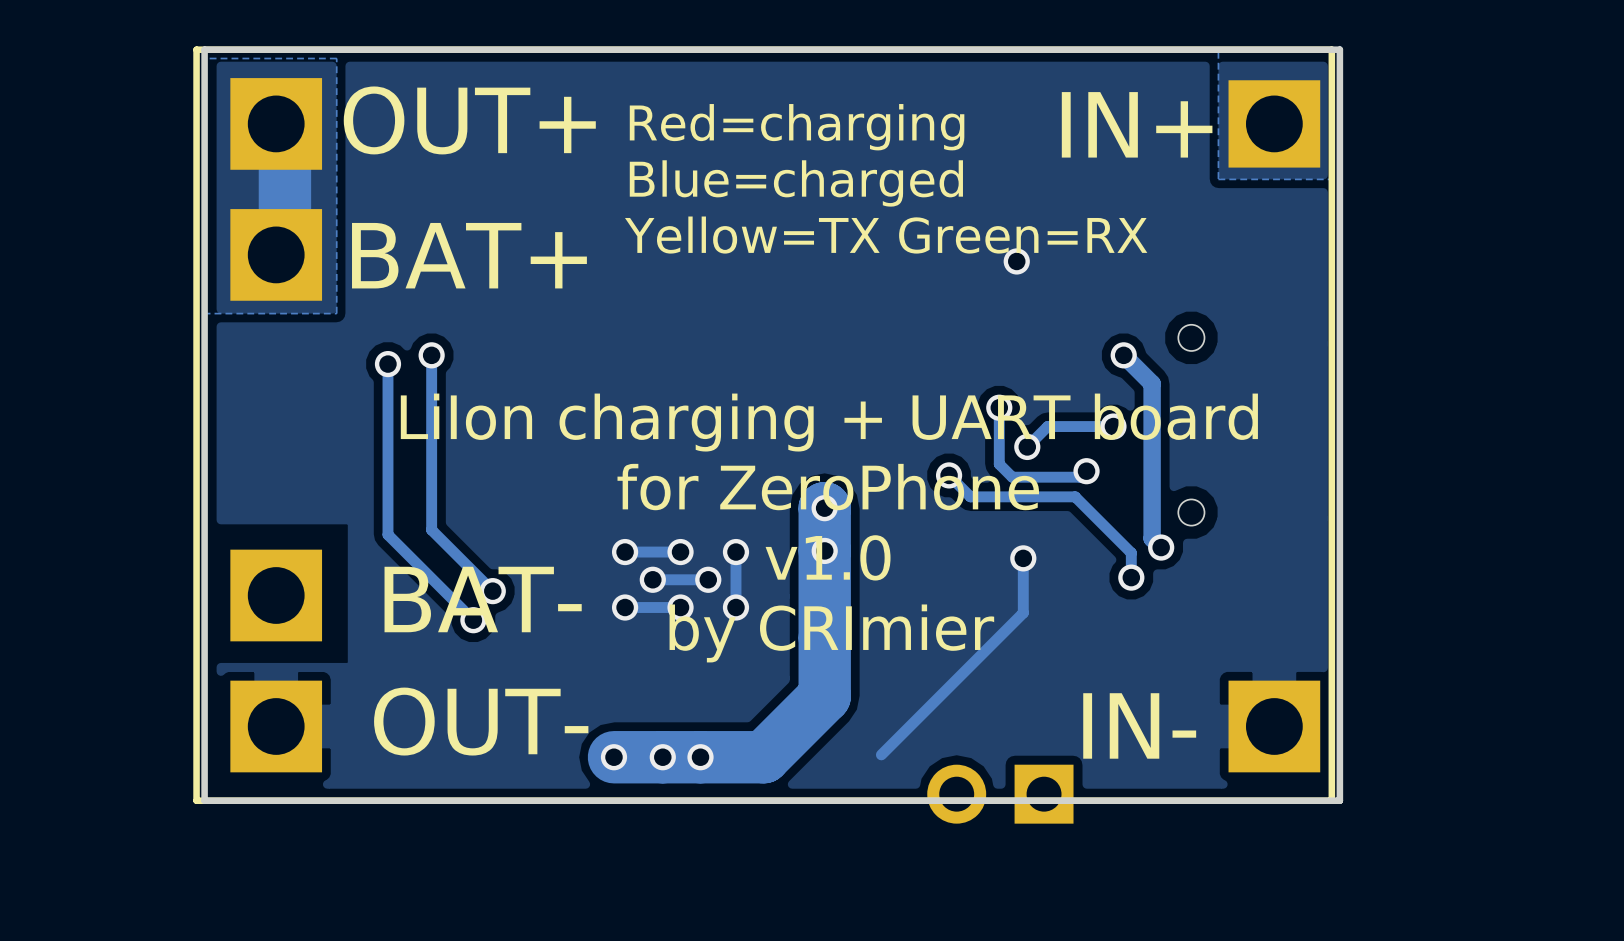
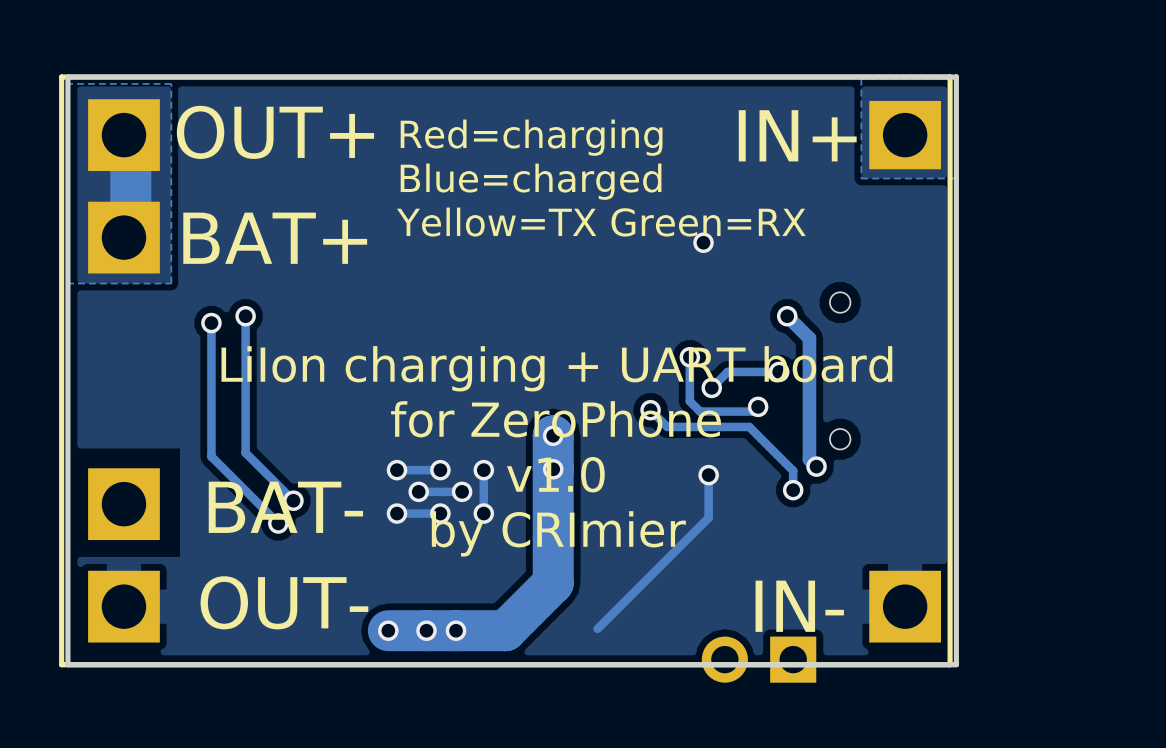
part position: (1000, 794) -> (759, 659)

